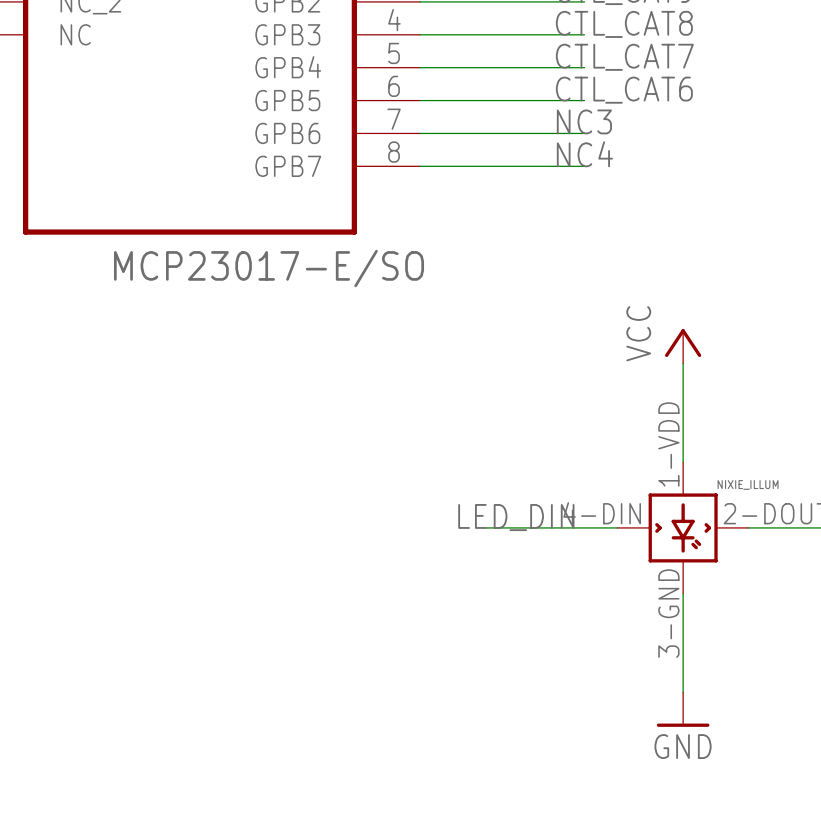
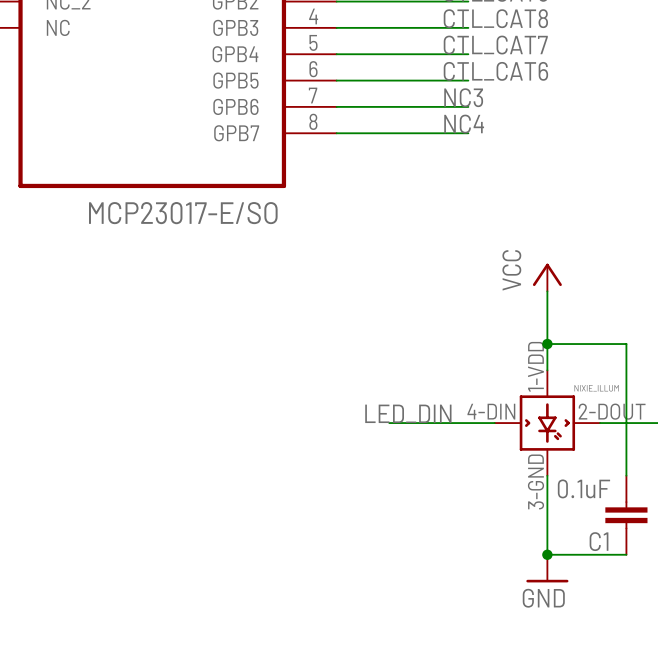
wire: none -> (547, 344) (626, 344) (626, 475)
junction: none -> (547, 344)
C1: none -> 0.1uF (626, 515)
wire: none -> (547, 554) (626, 554)
junction: none -> (547, 554)

